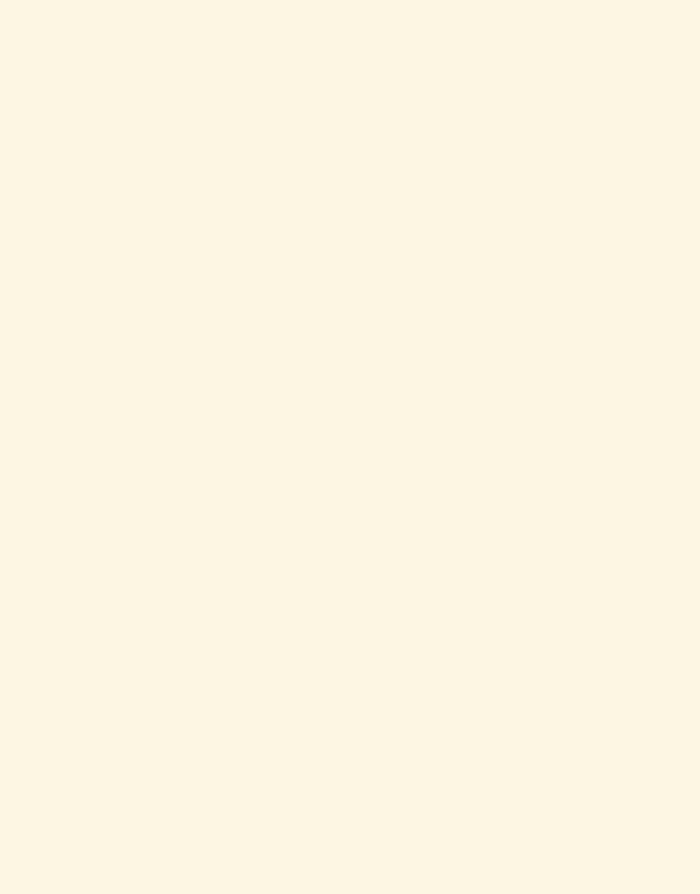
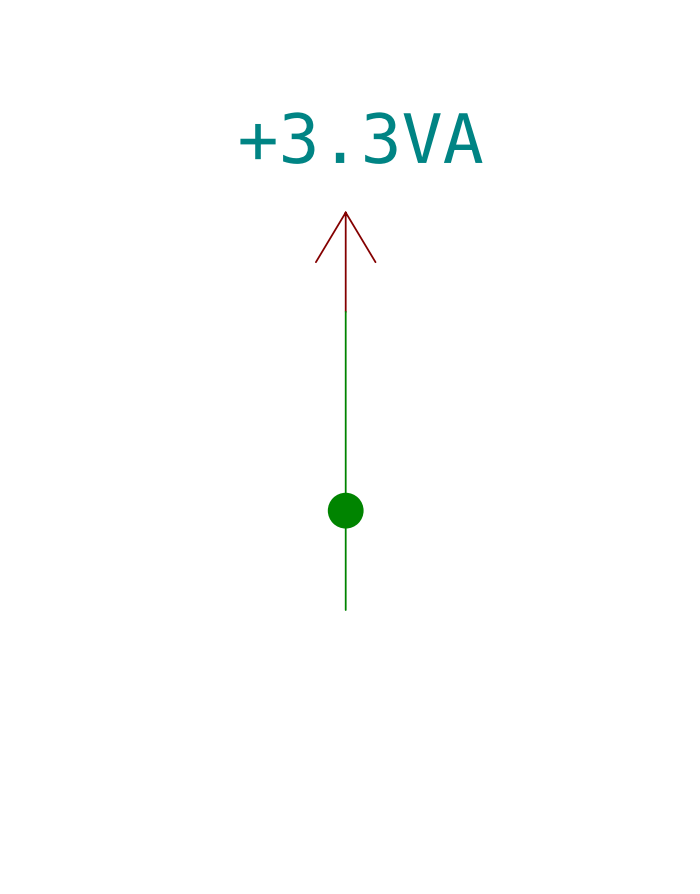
power symbol: none -> +3.3VA (345, 262)
wire: none -> (345, 311) (345, 610)
junction: none -> (345, 510)

